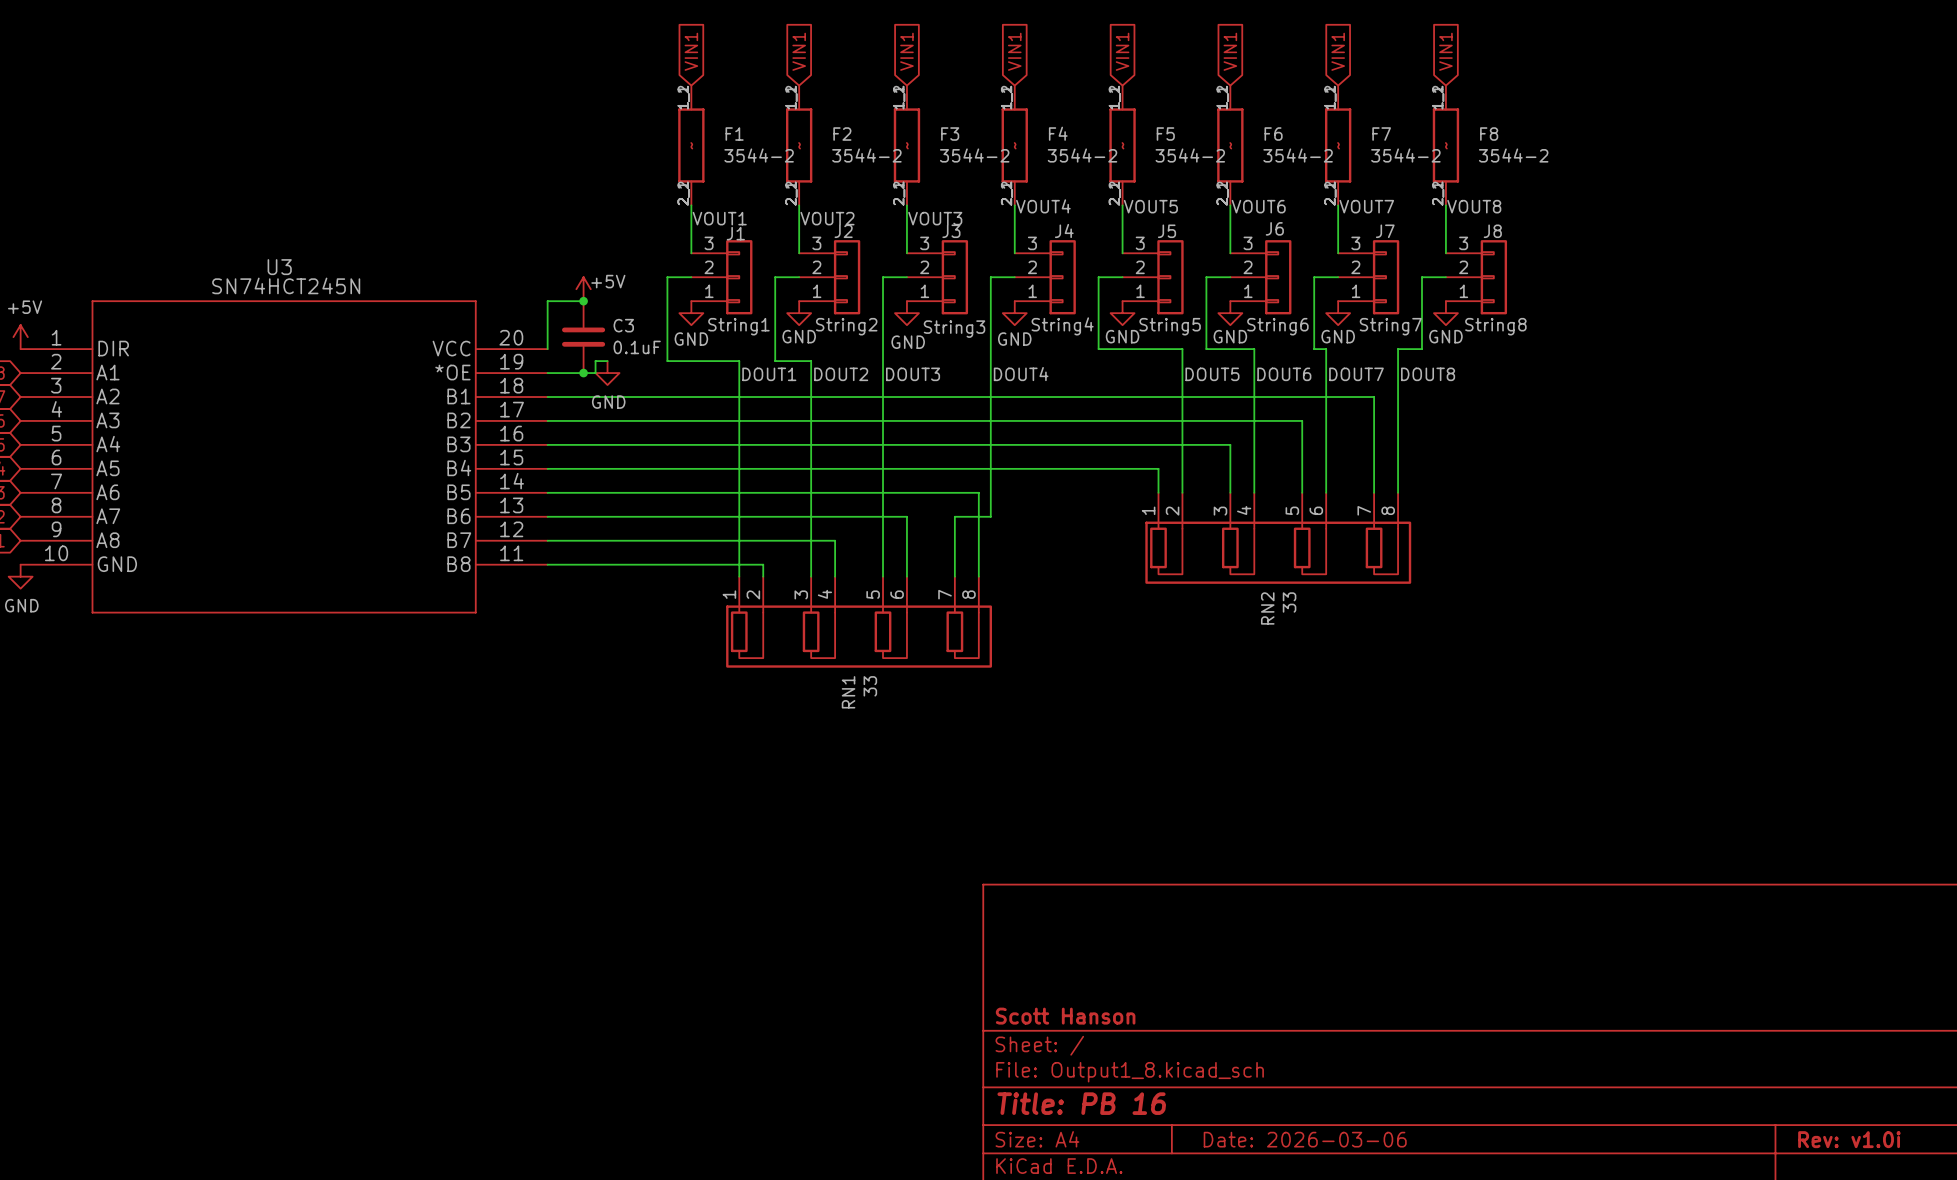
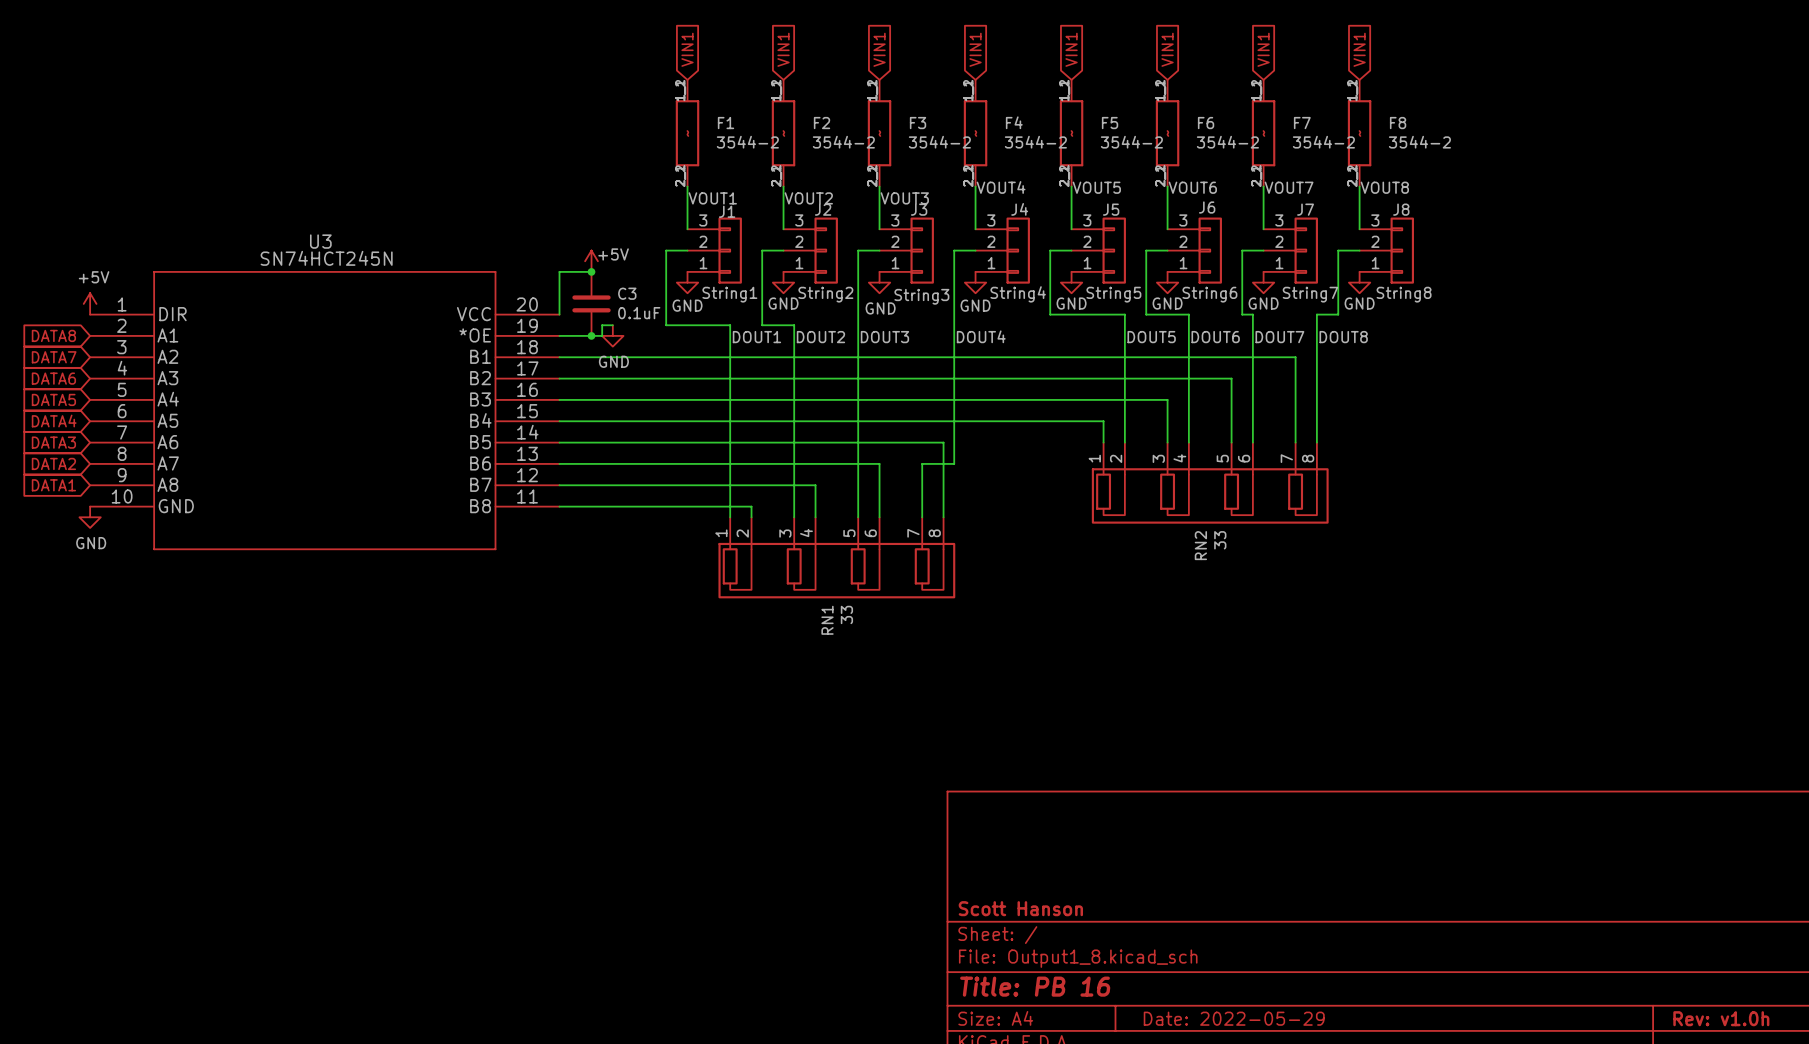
title block: Date: 2026-03-06 (1305, 1139) -> Date: 2022-05-29 (1234, 1018)
title block: Rev: v1.0i (1849, 1139) -> Rev: v1.0h (1721, 1018)

